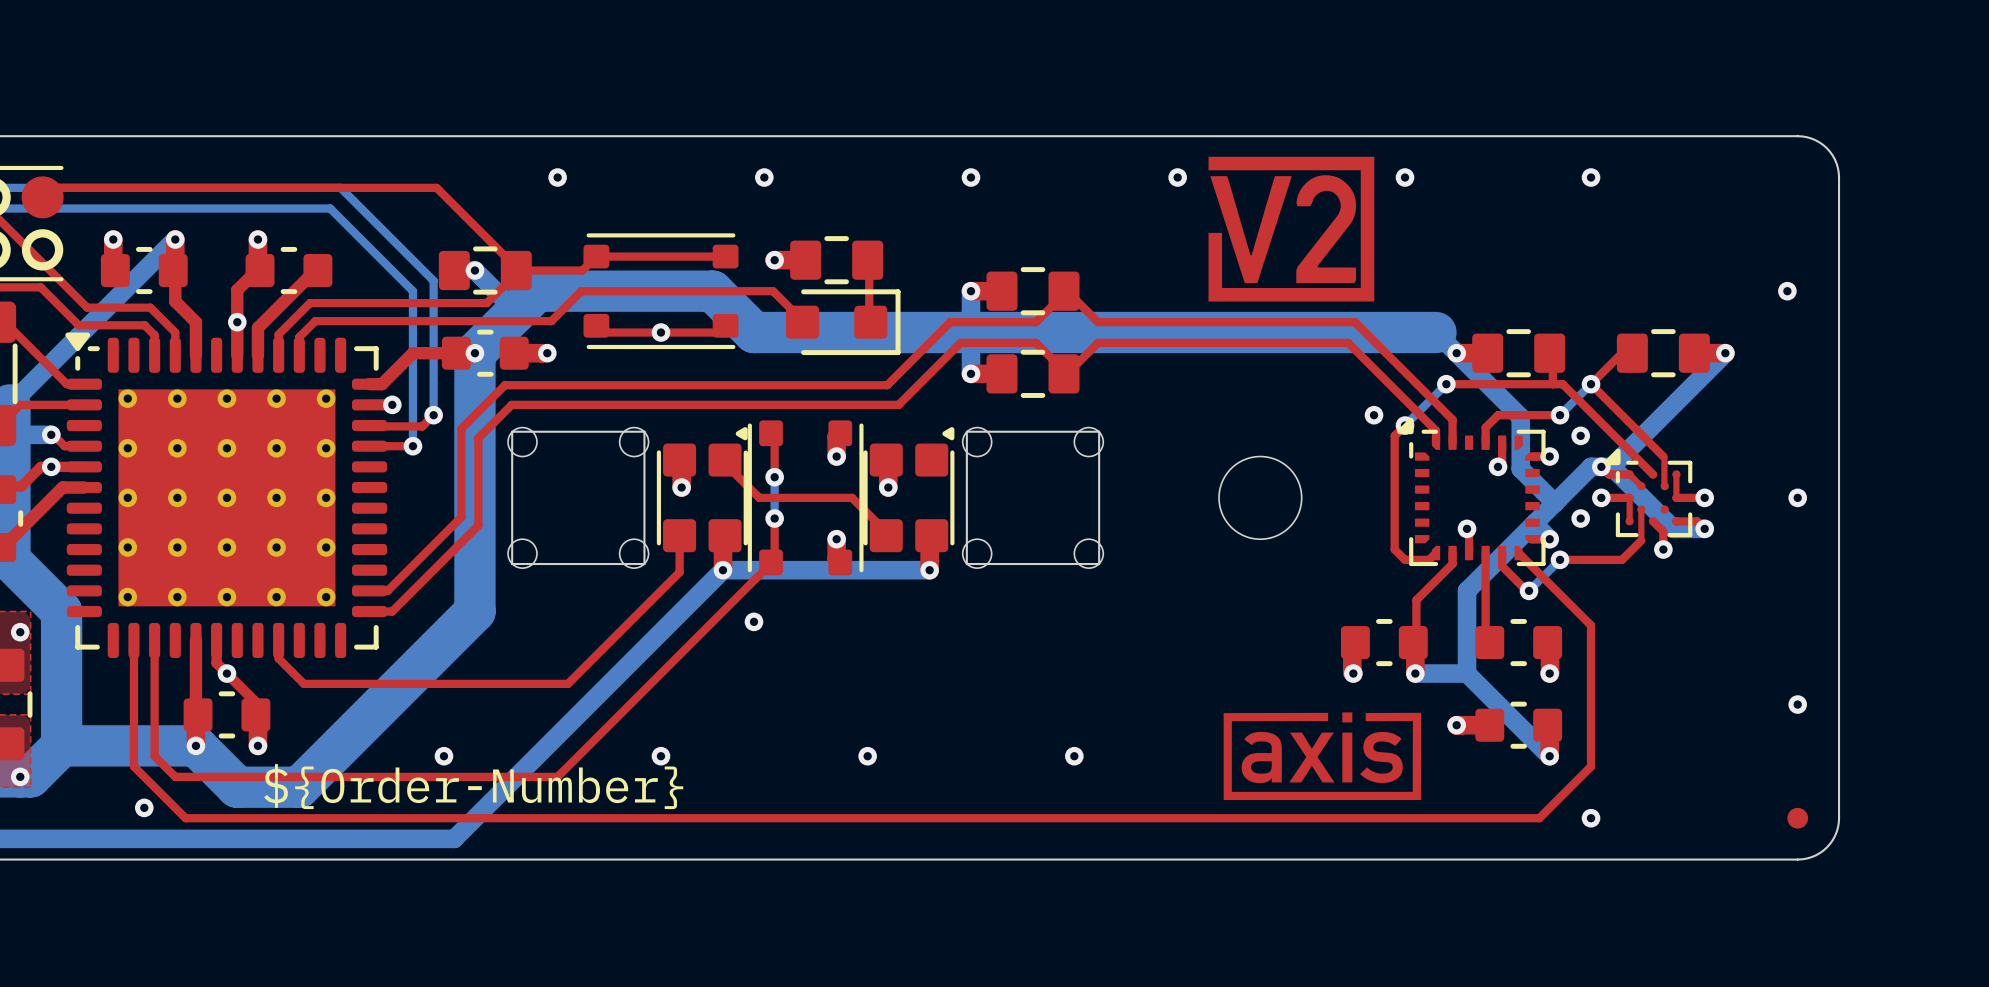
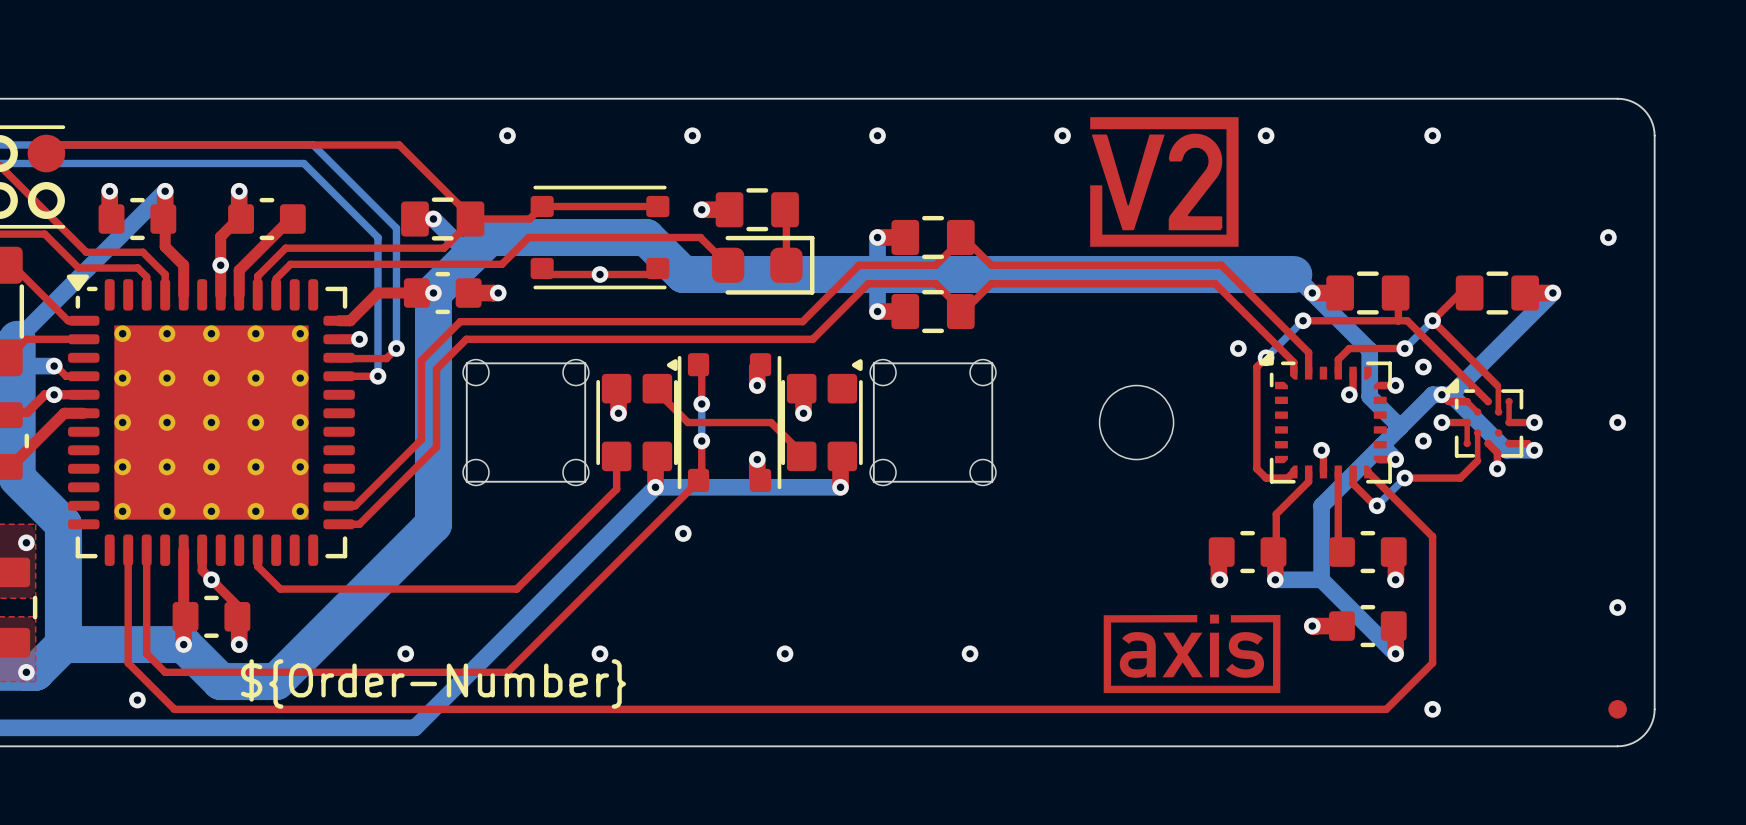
part footprint: [786, 289, 901, 356] -> [711, 235, 815, 295]

